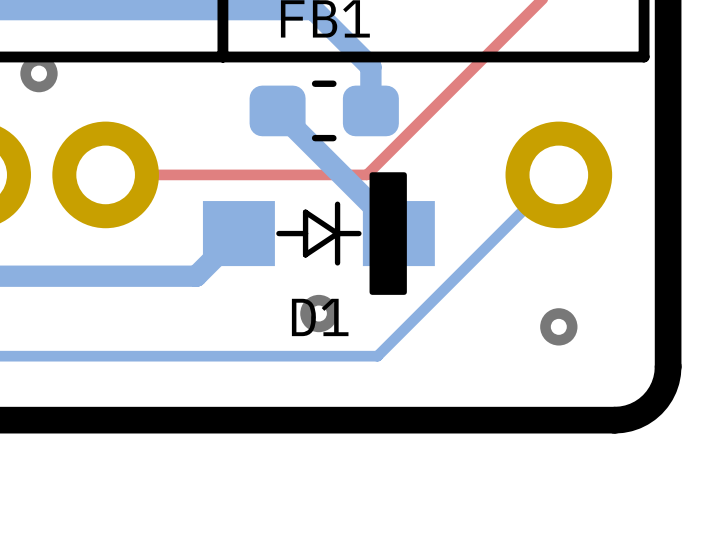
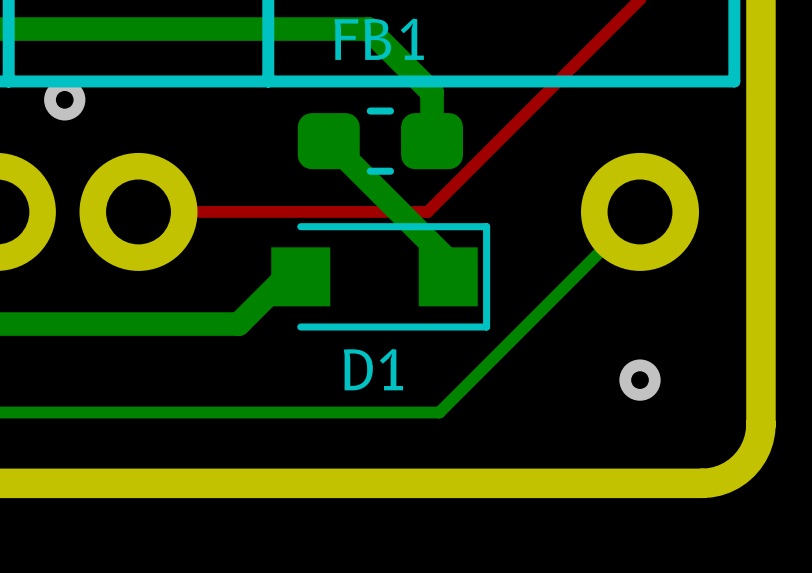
D1 footprint: [202, 172, 435, 295] -> [271, 223, 491, 331]
via: (318, 313) -> none

